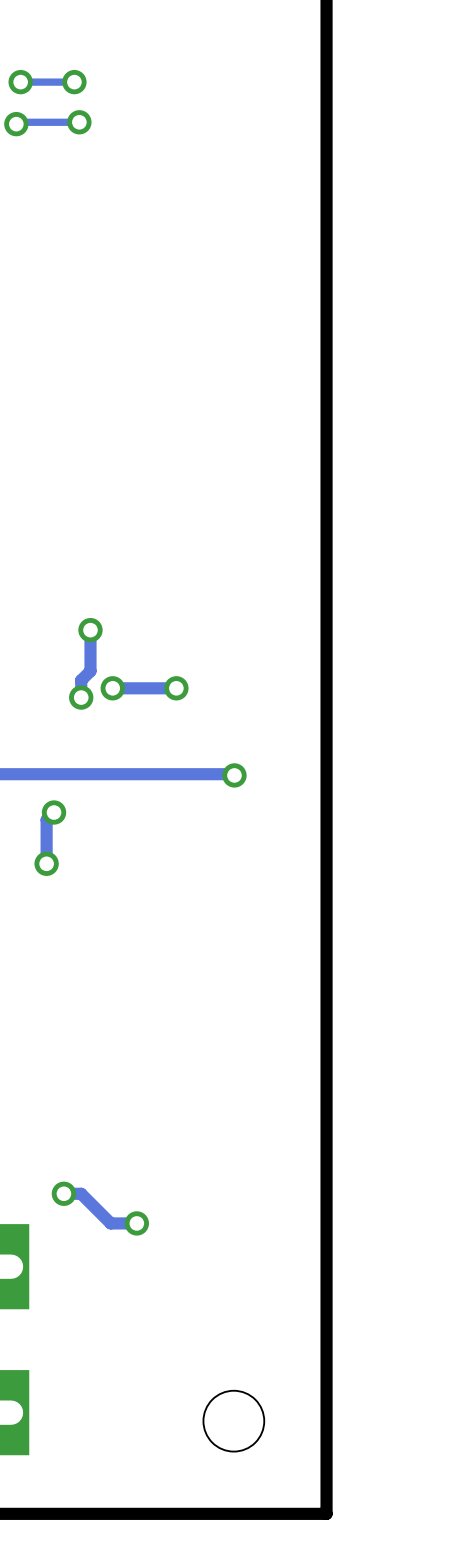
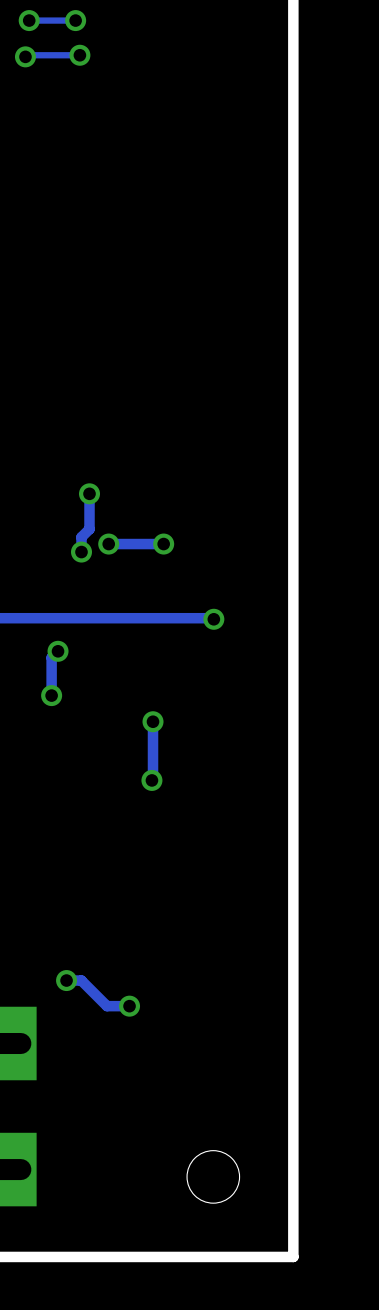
track: none -> (153, 721) (151, 780)
via: none -> (153, 721)
via: none -> (151, 780)

